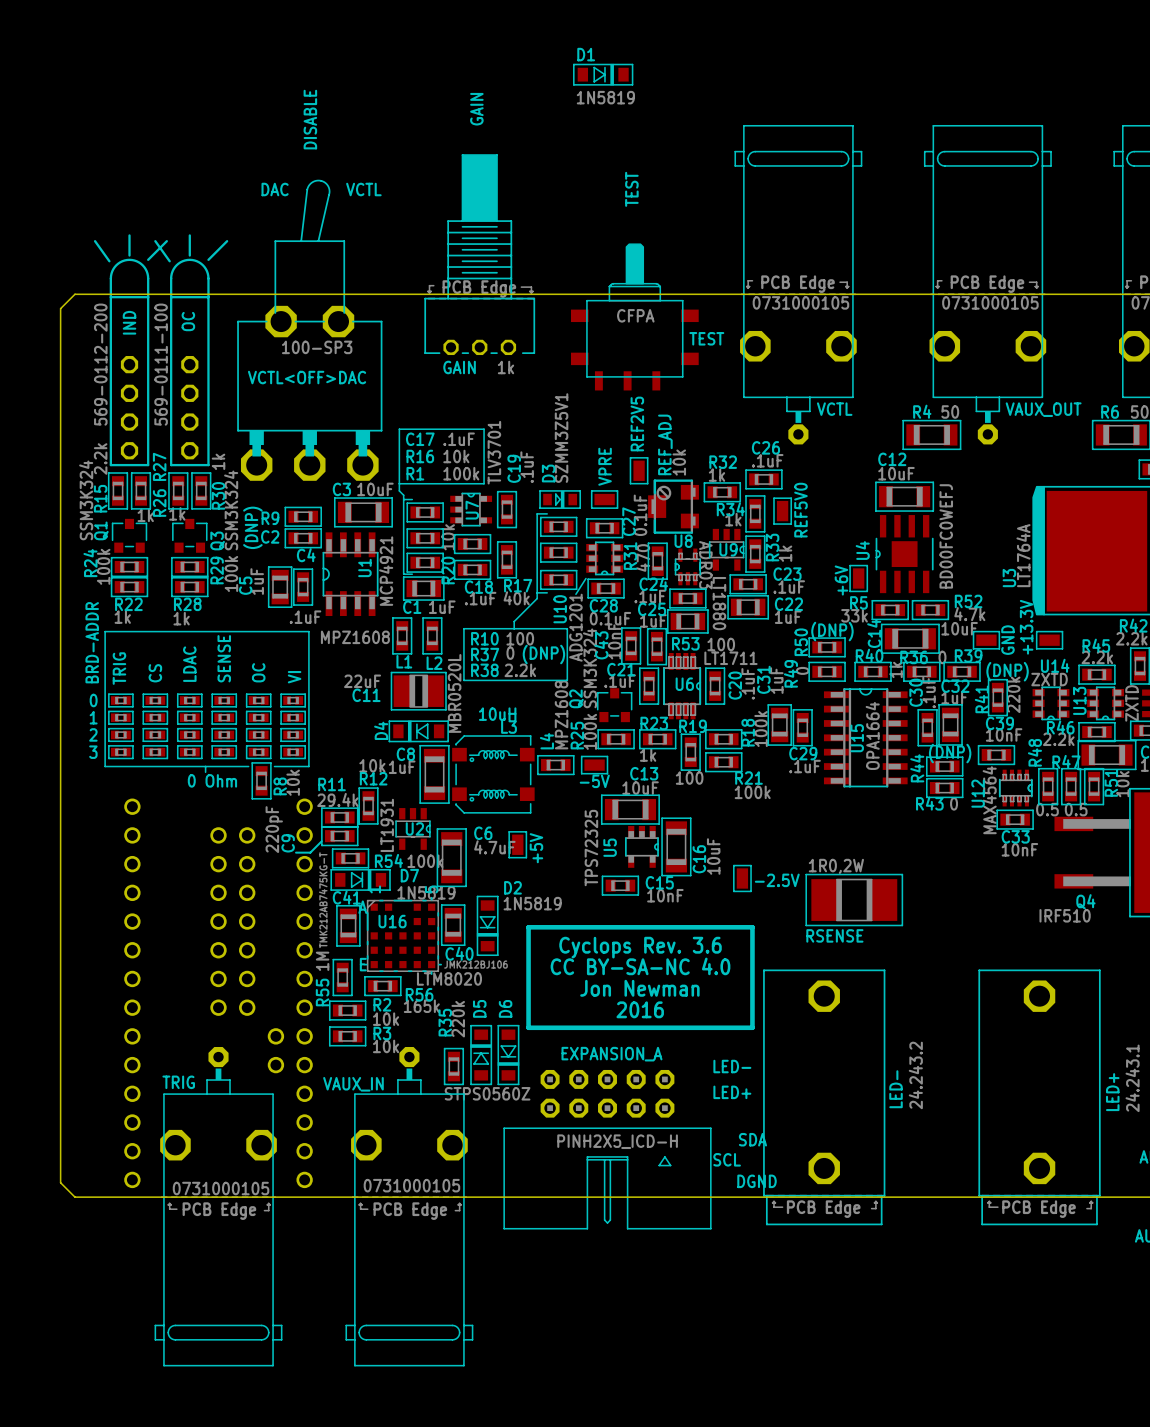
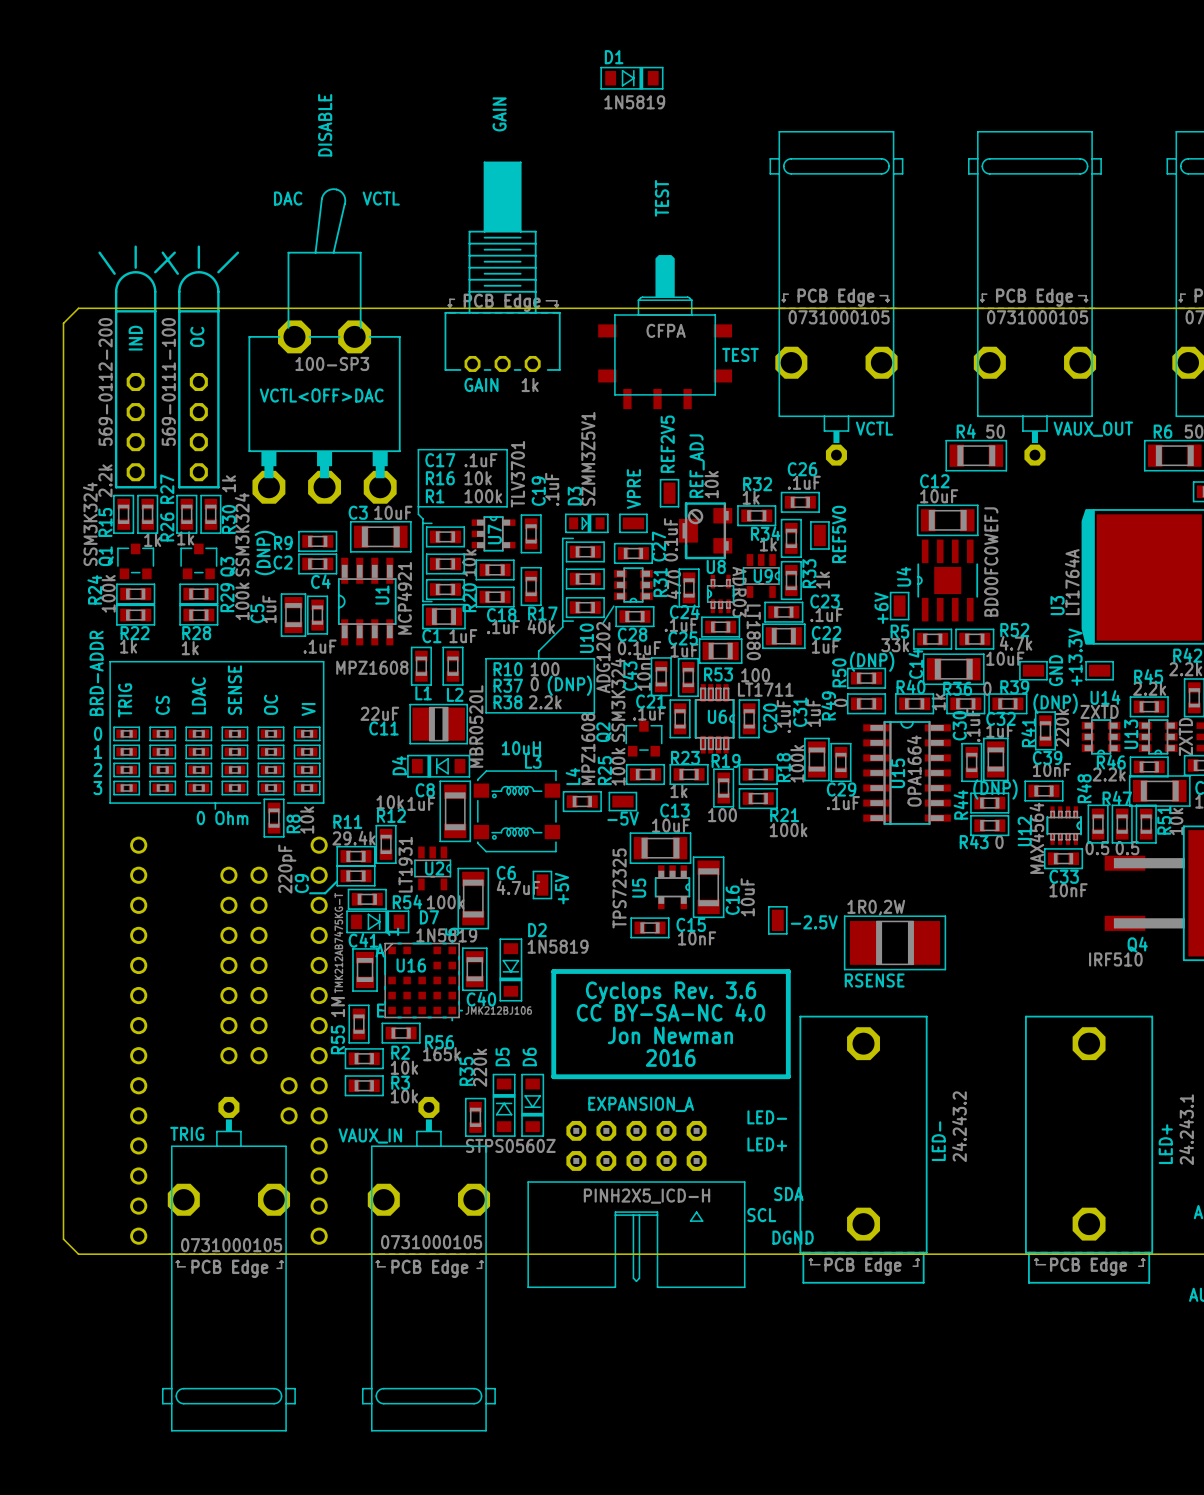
U10 value: ADG1201 (575, 627) -> ADG1202 (603, 657)
U16 value: LTM8020 (449, 978) -> none

